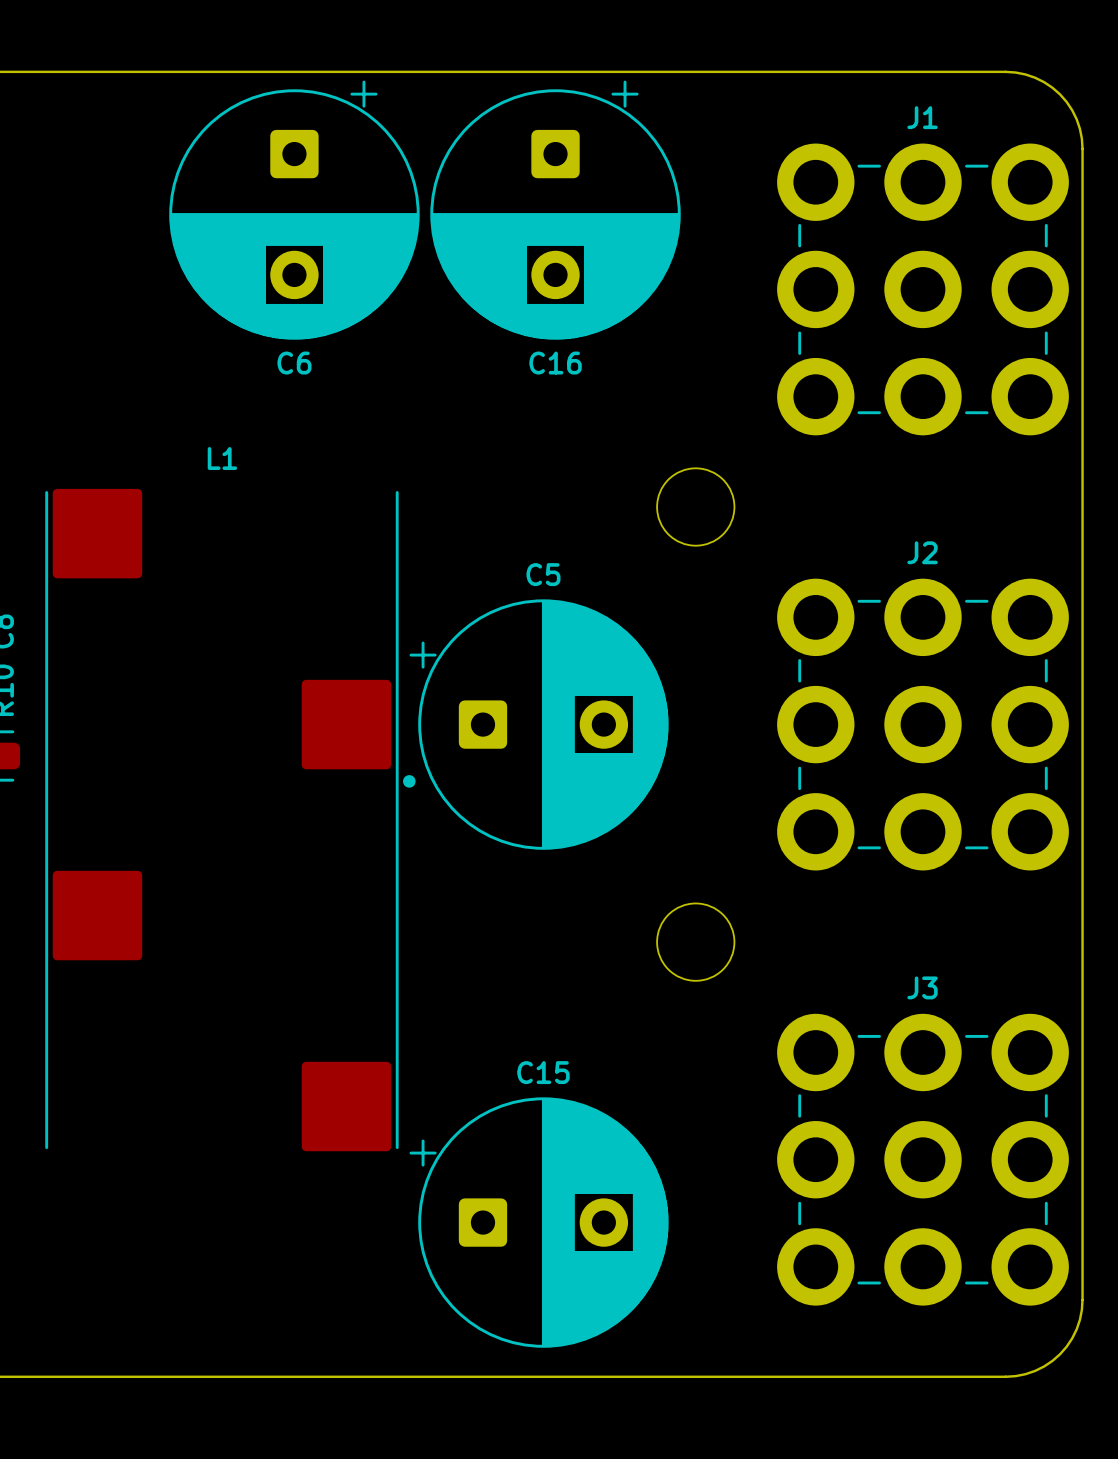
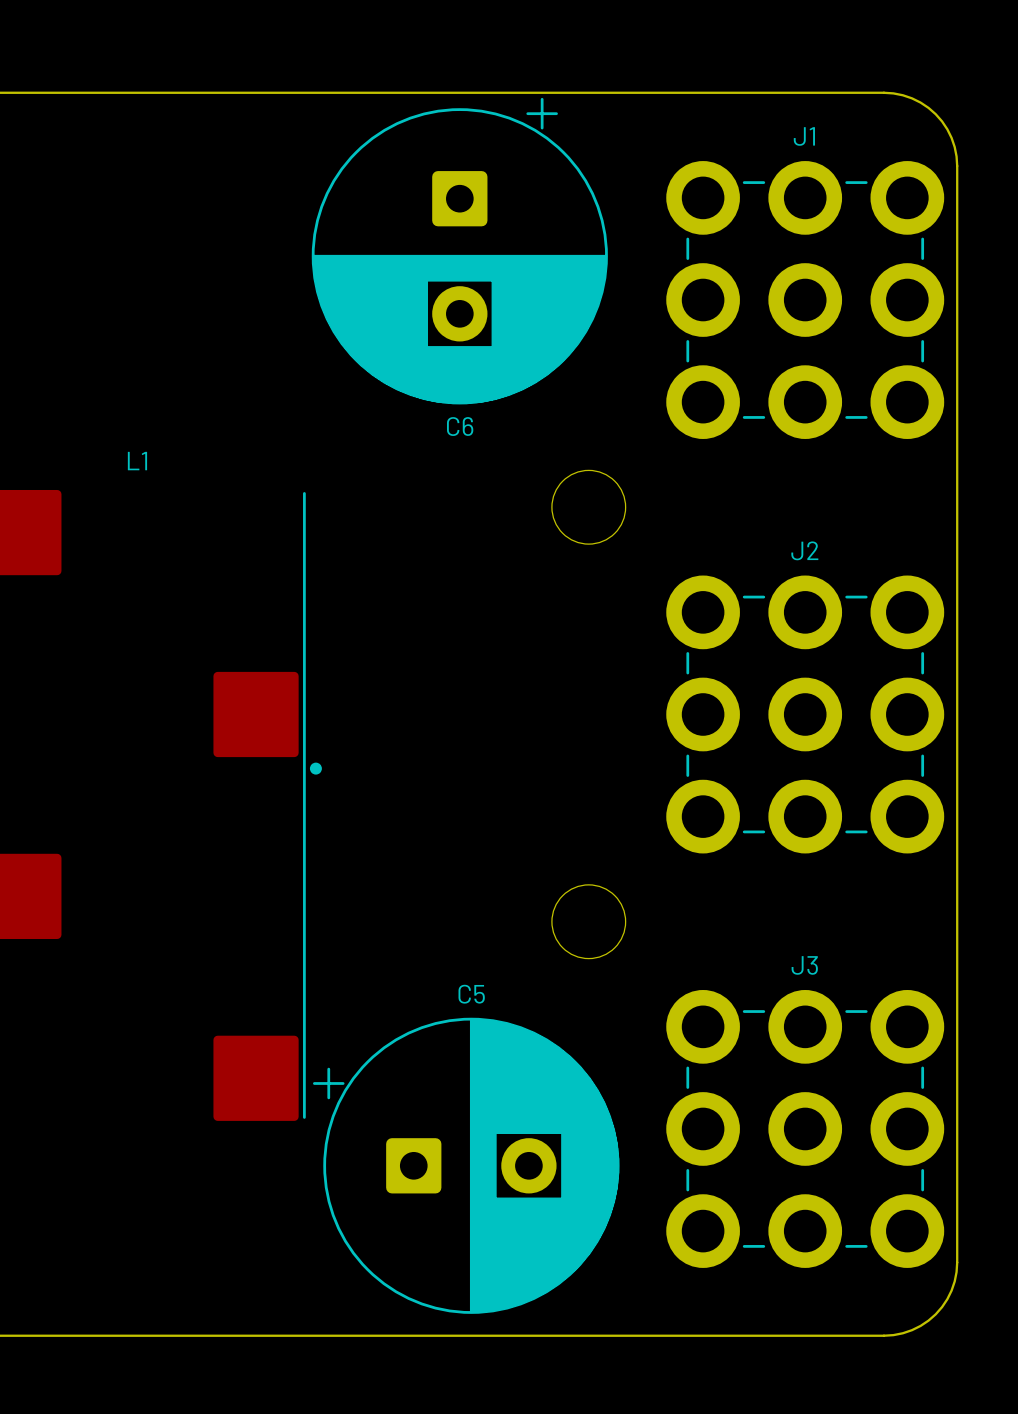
C6 footprint: [169, 80, 420, 340] -> [311, 97, 608, 405]
C16: (555, 210) -> none
C5 footprint: [409, 599, 669, 850] -> [312, 1017, 620, 1314]
C15: (539, 1222) -> none

